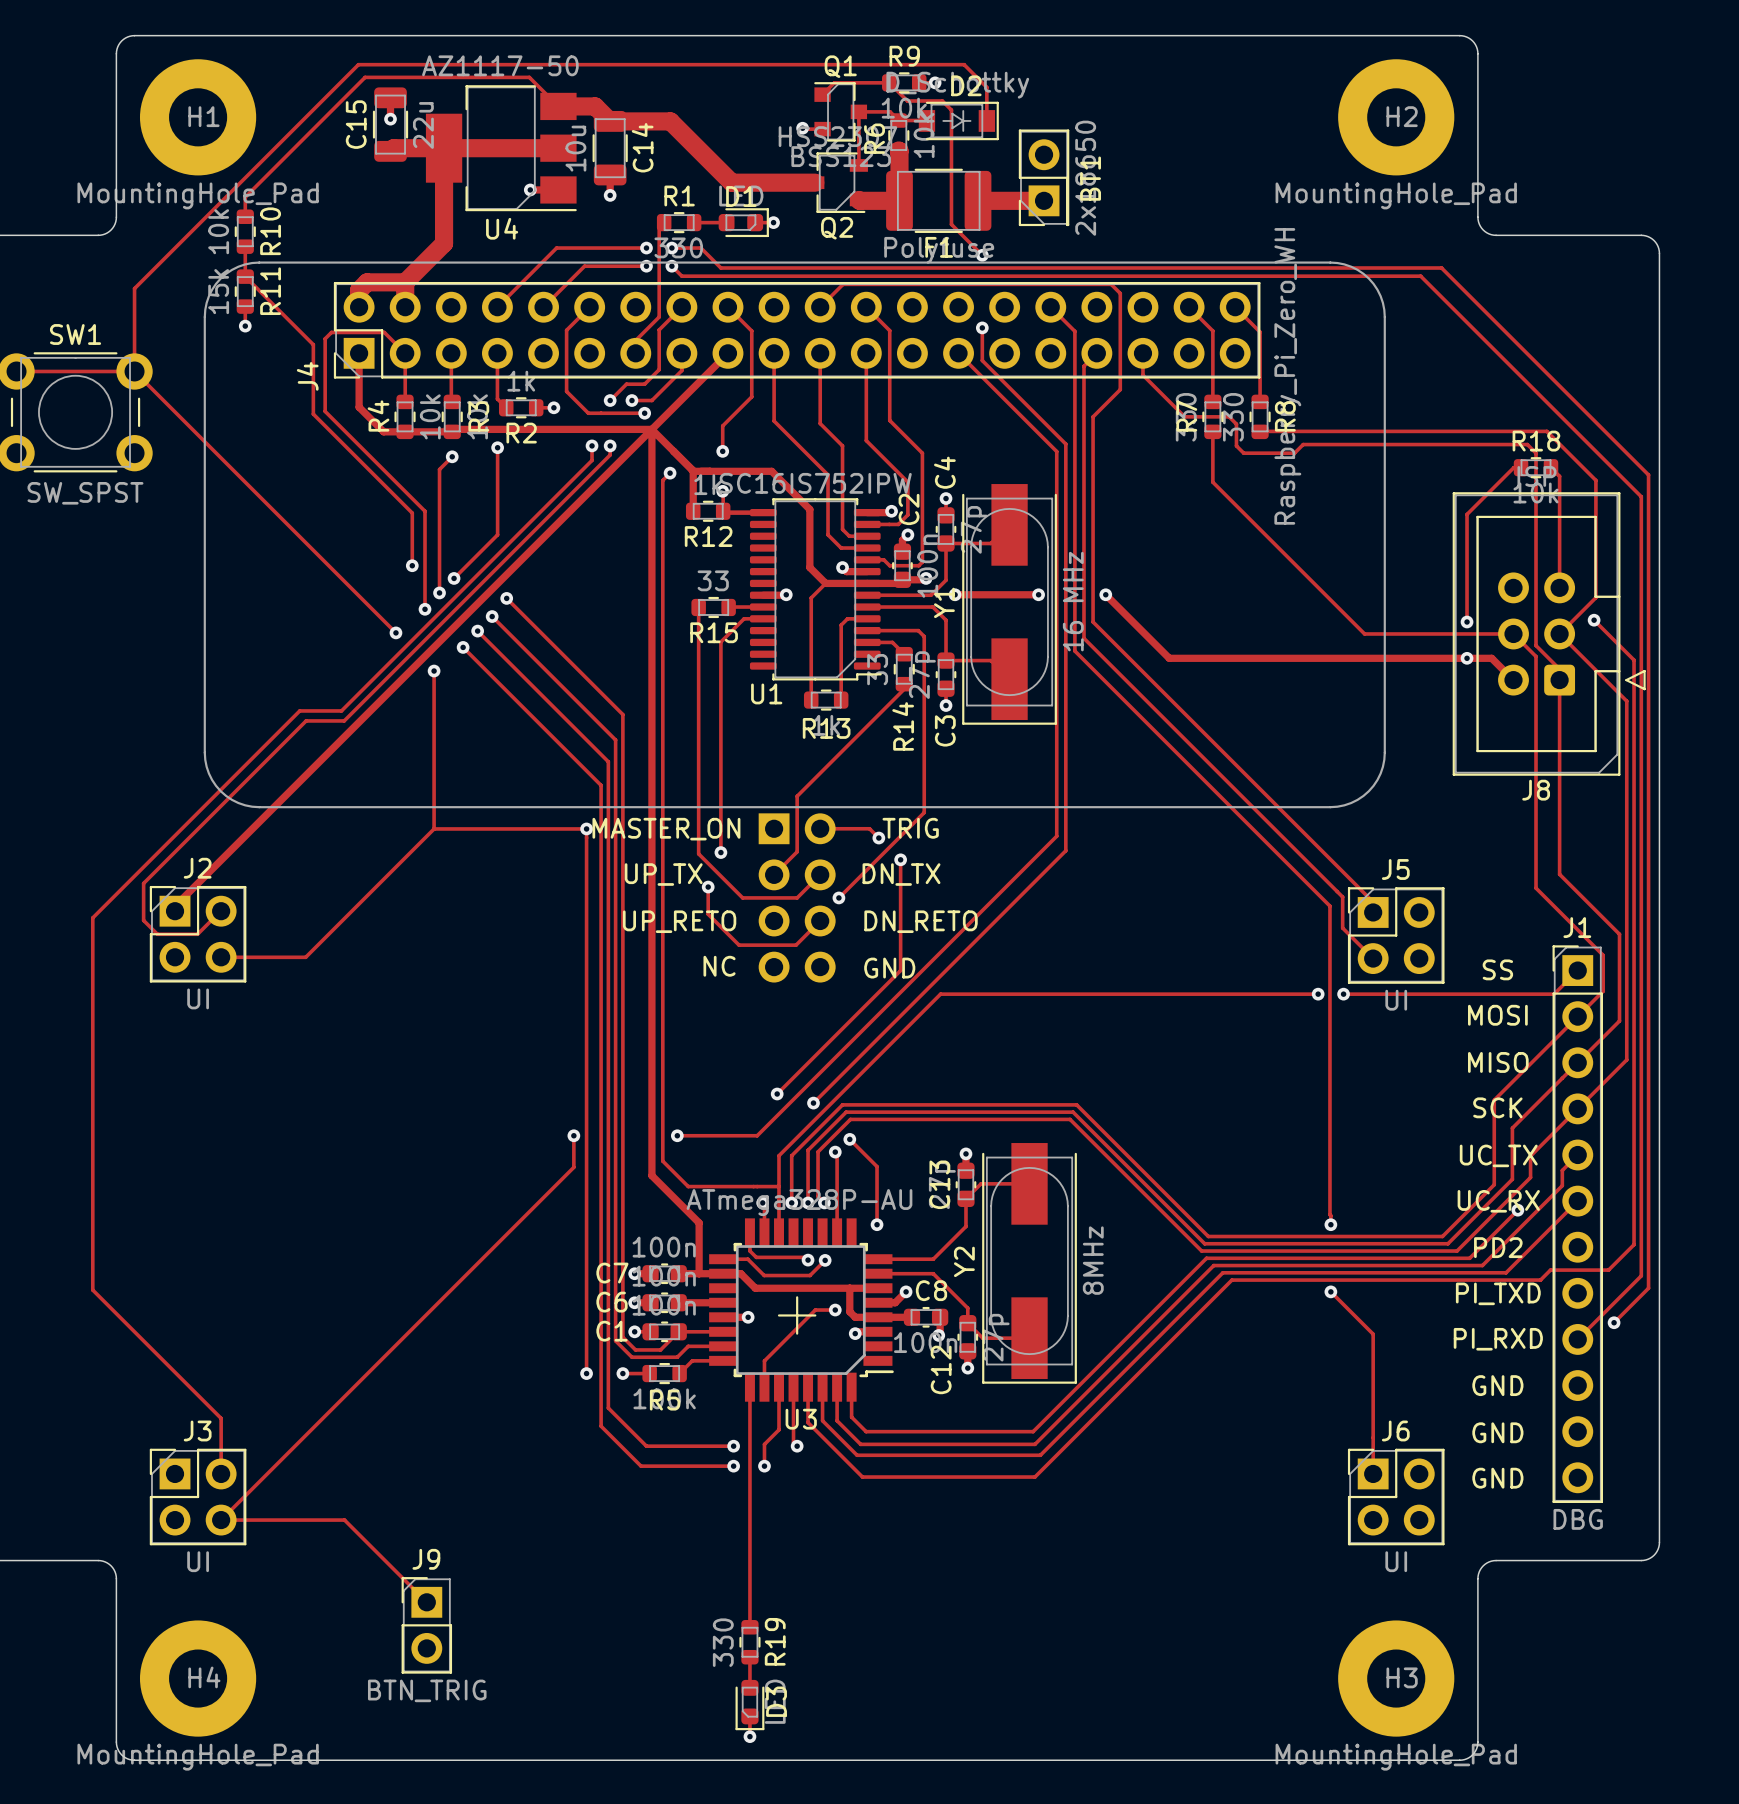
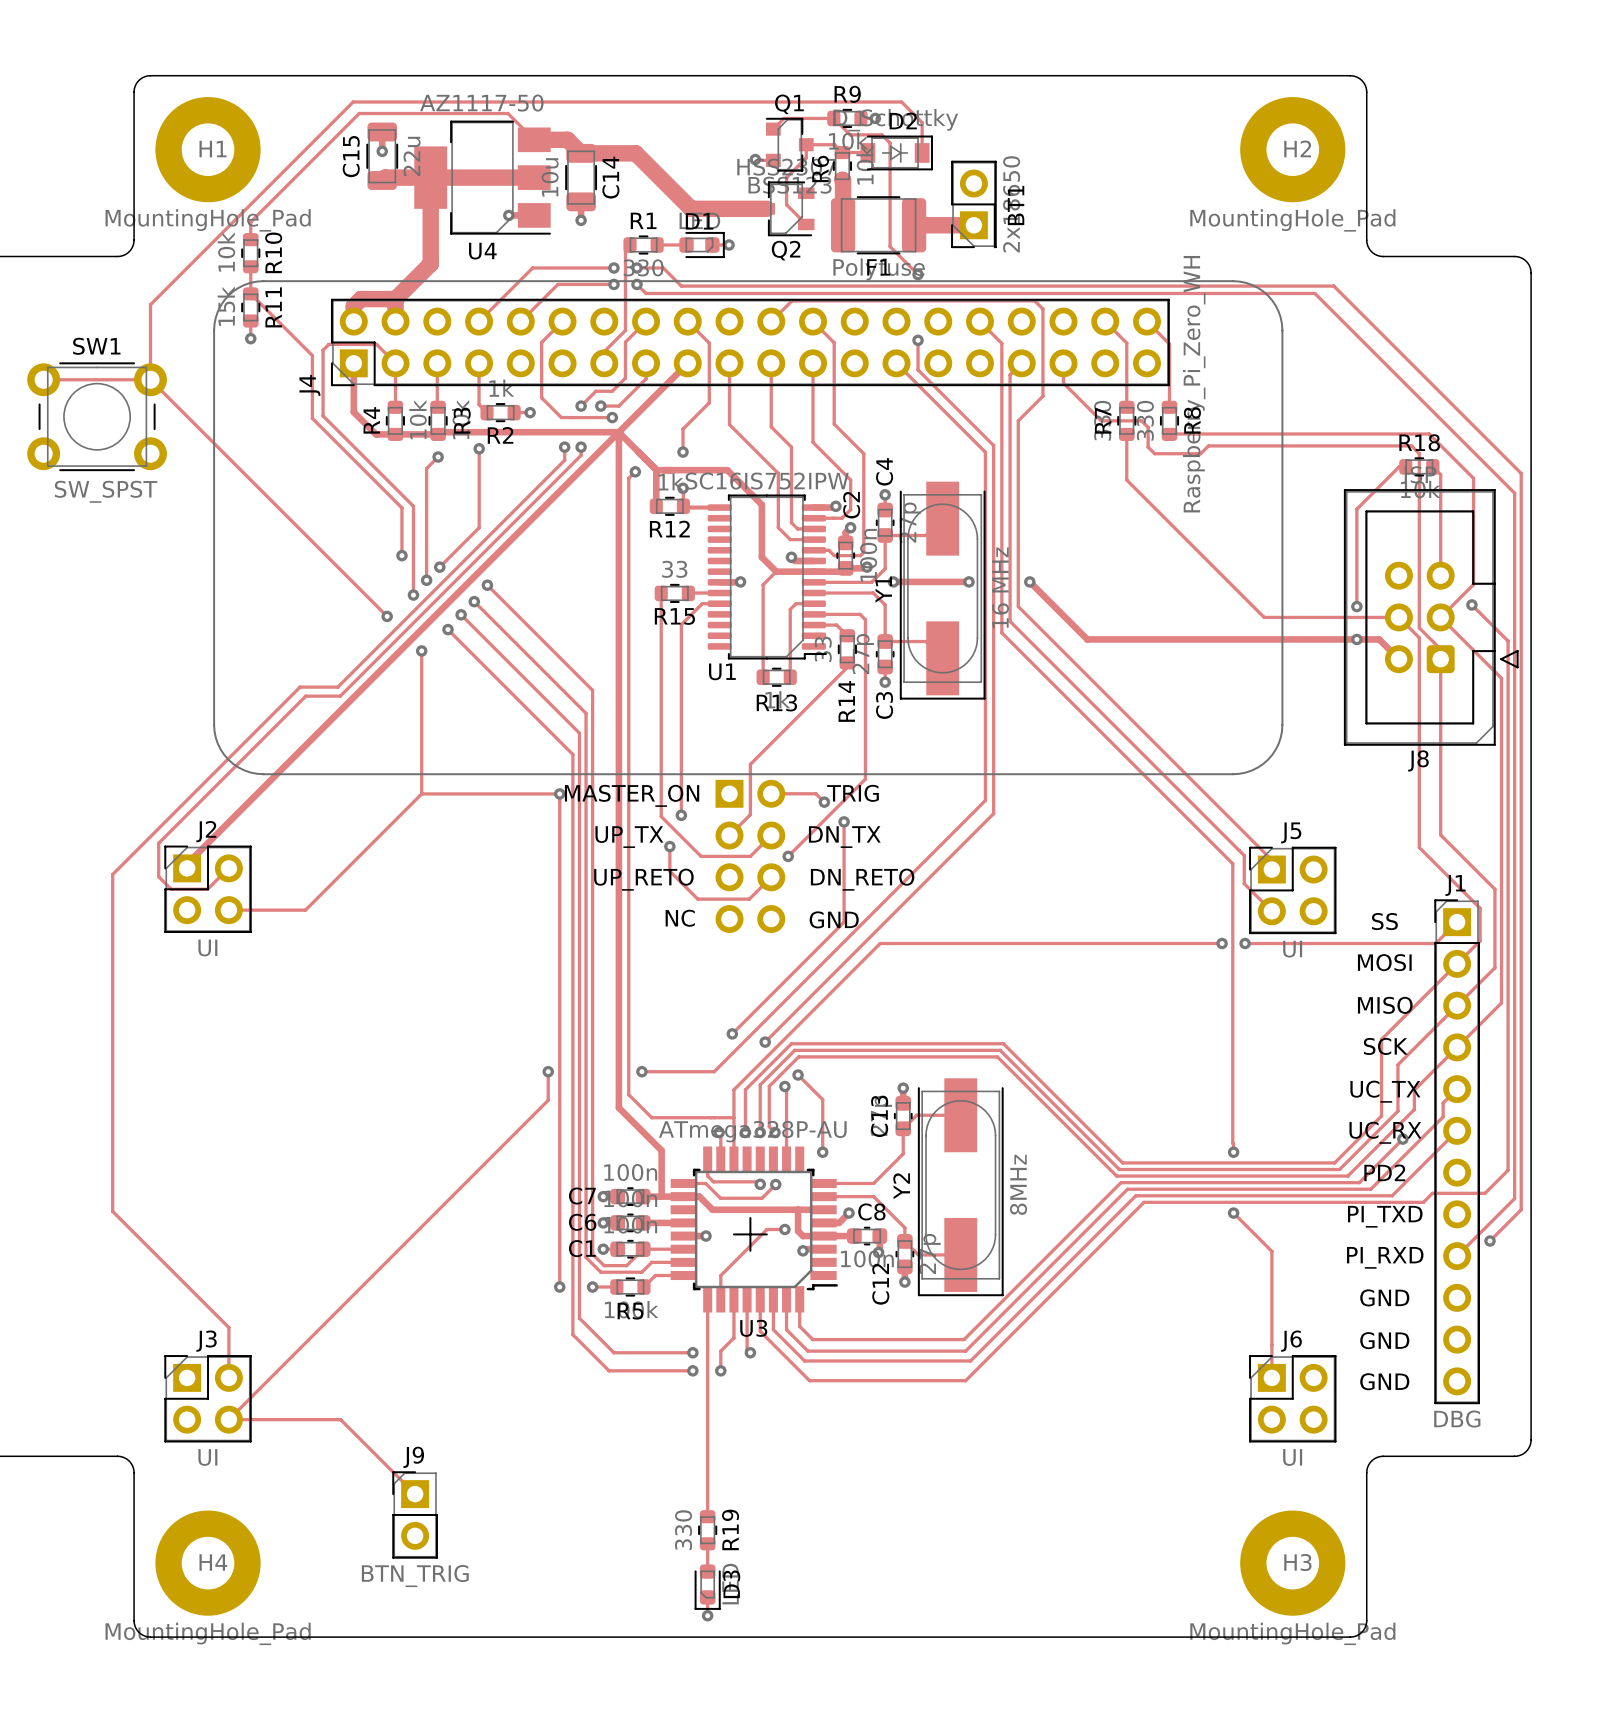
track: (858, 126) (858, 165) -> (806, 157) (786, 177) (786, 204) (806, 224)
track: (858, 199) (899, 200) -> none

